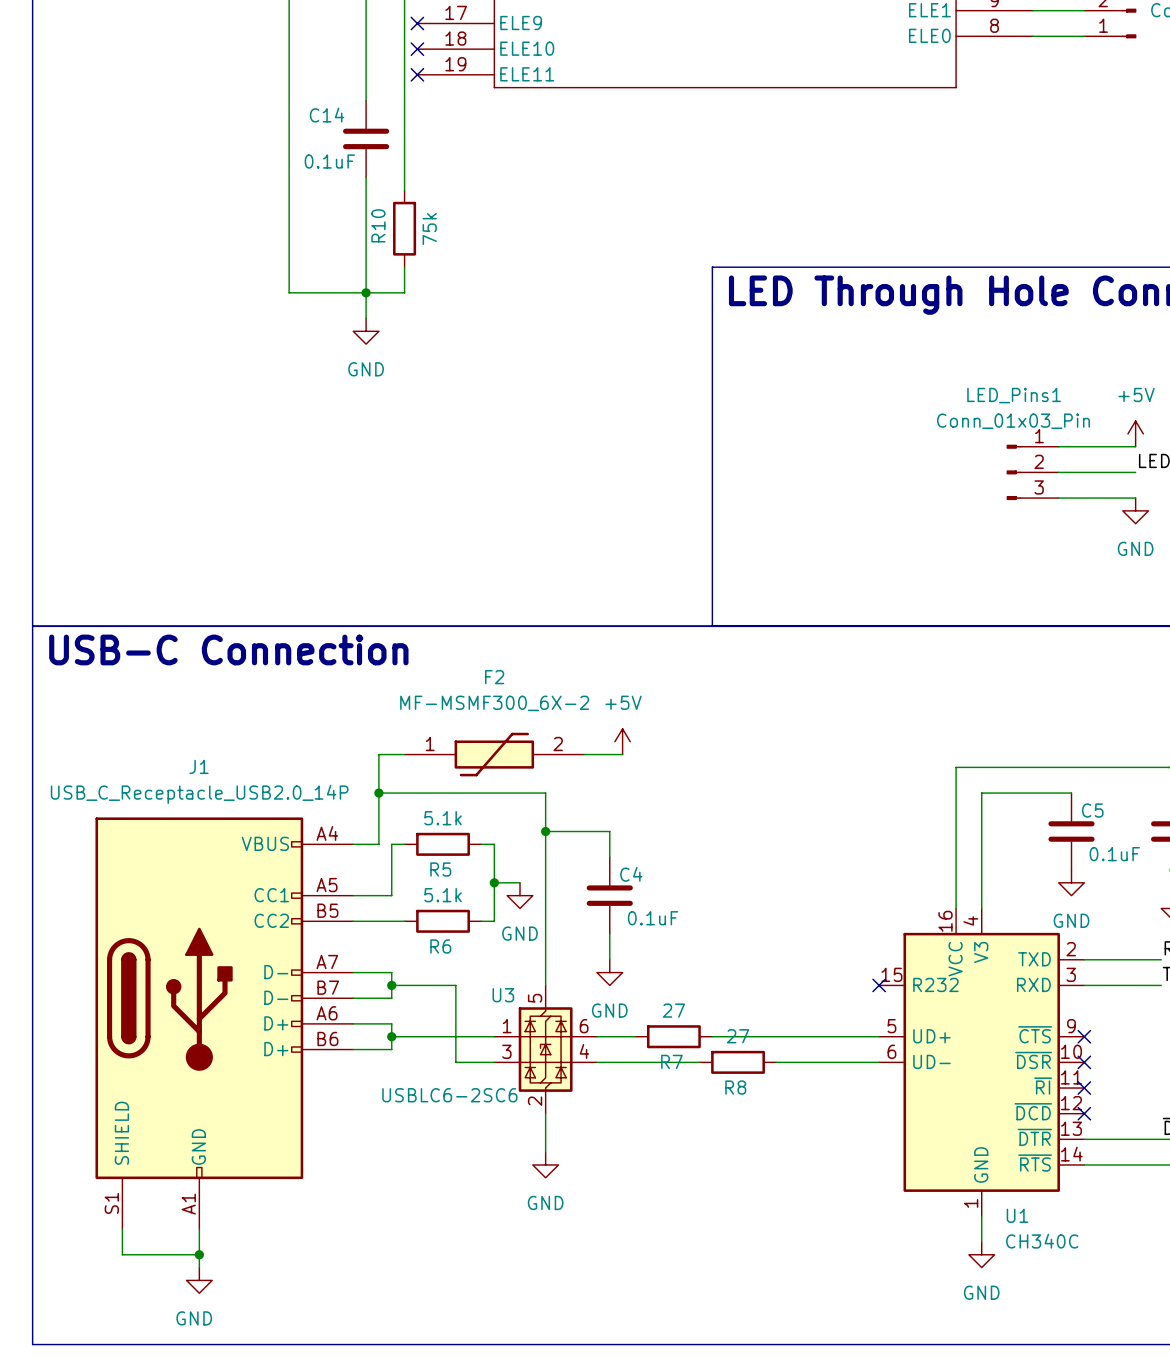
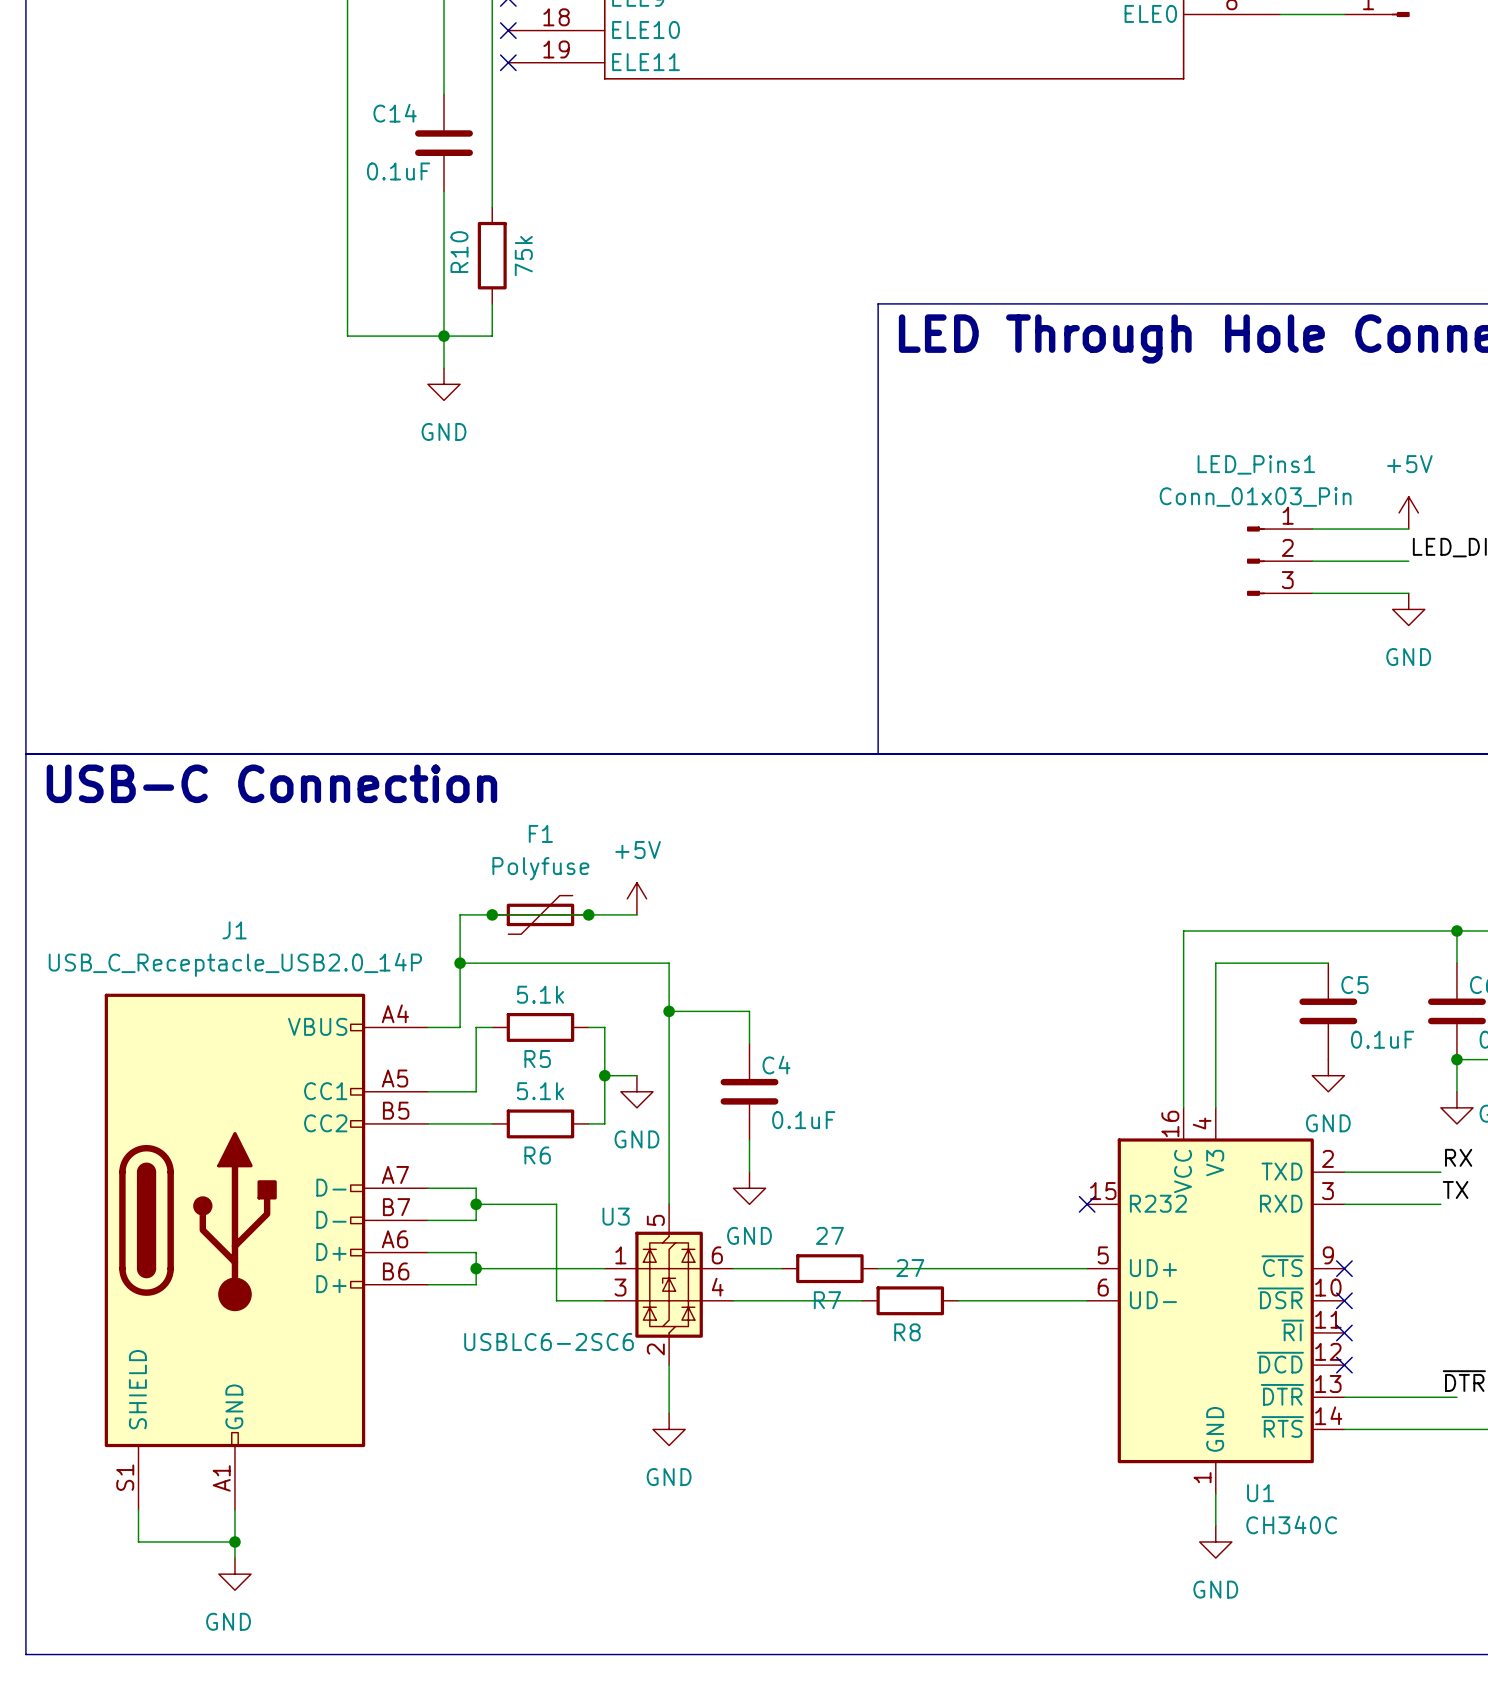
power symbol position: +5V (622, 741) -> +5V (636, 898)
junction: none -> (492, 914)
F1: none -> Polyfuse (540, 914)
junction: none -> (588, 914)
F2: MF-MSMF300_6X-2 (494, 754) -> none
wire: (584, 754) (622, 754) -> none

